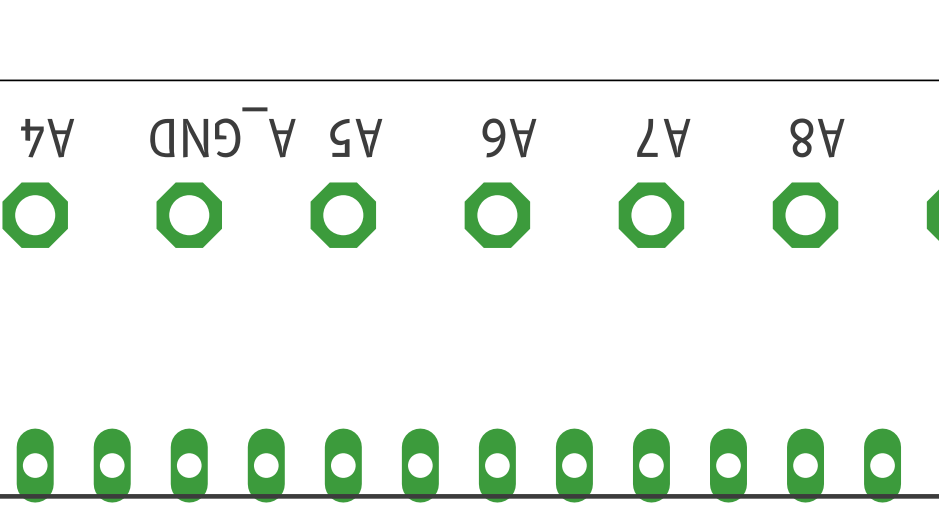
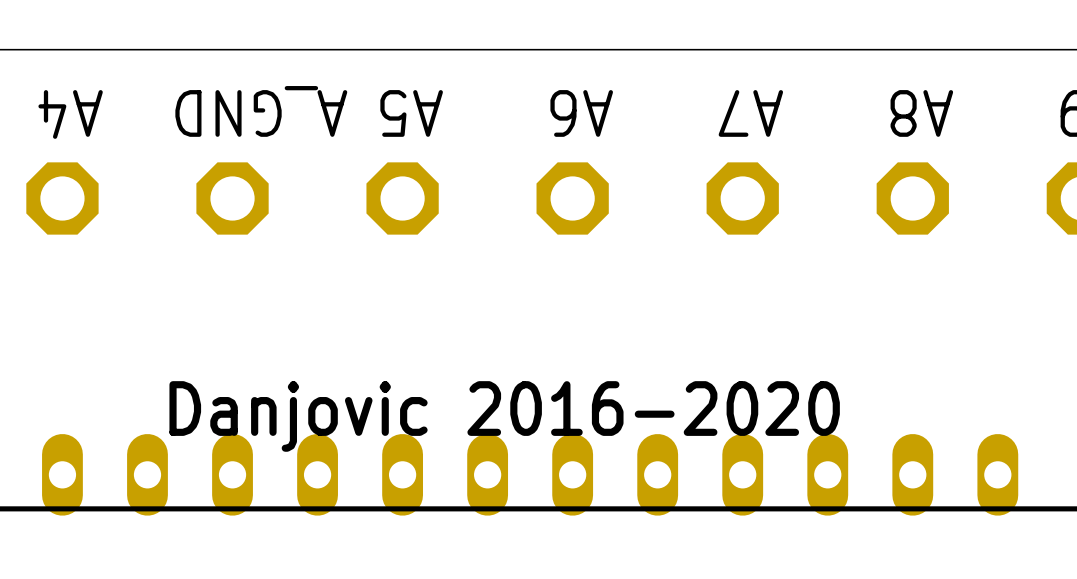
text: none -> Danjovic 2016-2020 (504, 416)

